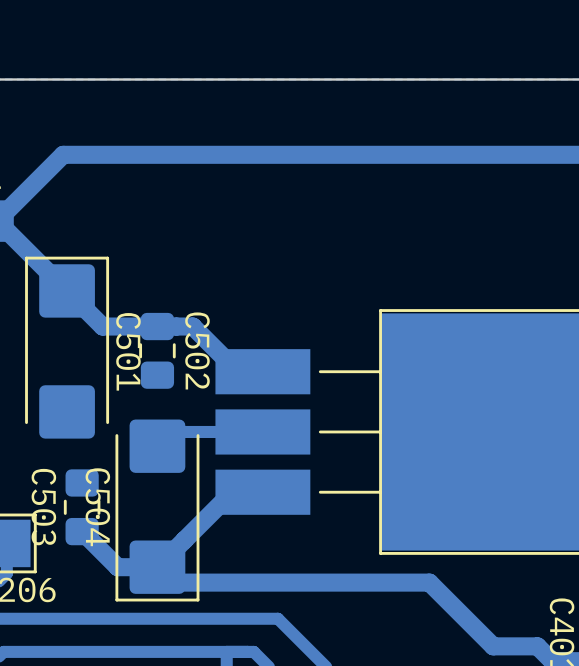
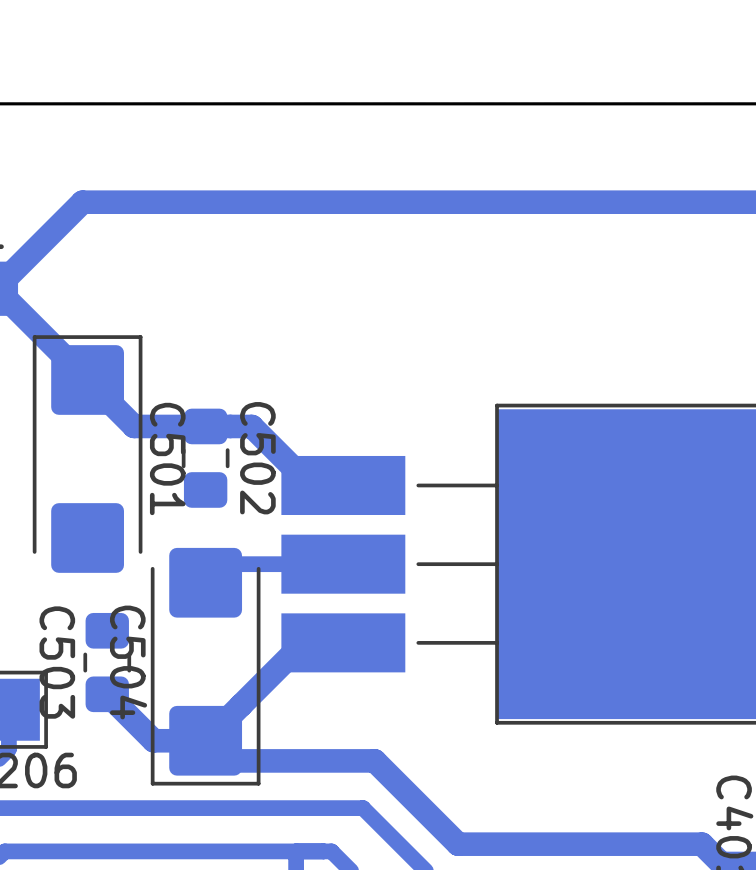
bottom track: (286, 582) (429, 582) (493, 646) -> (374, 760) (458, 844) (644, 844)

